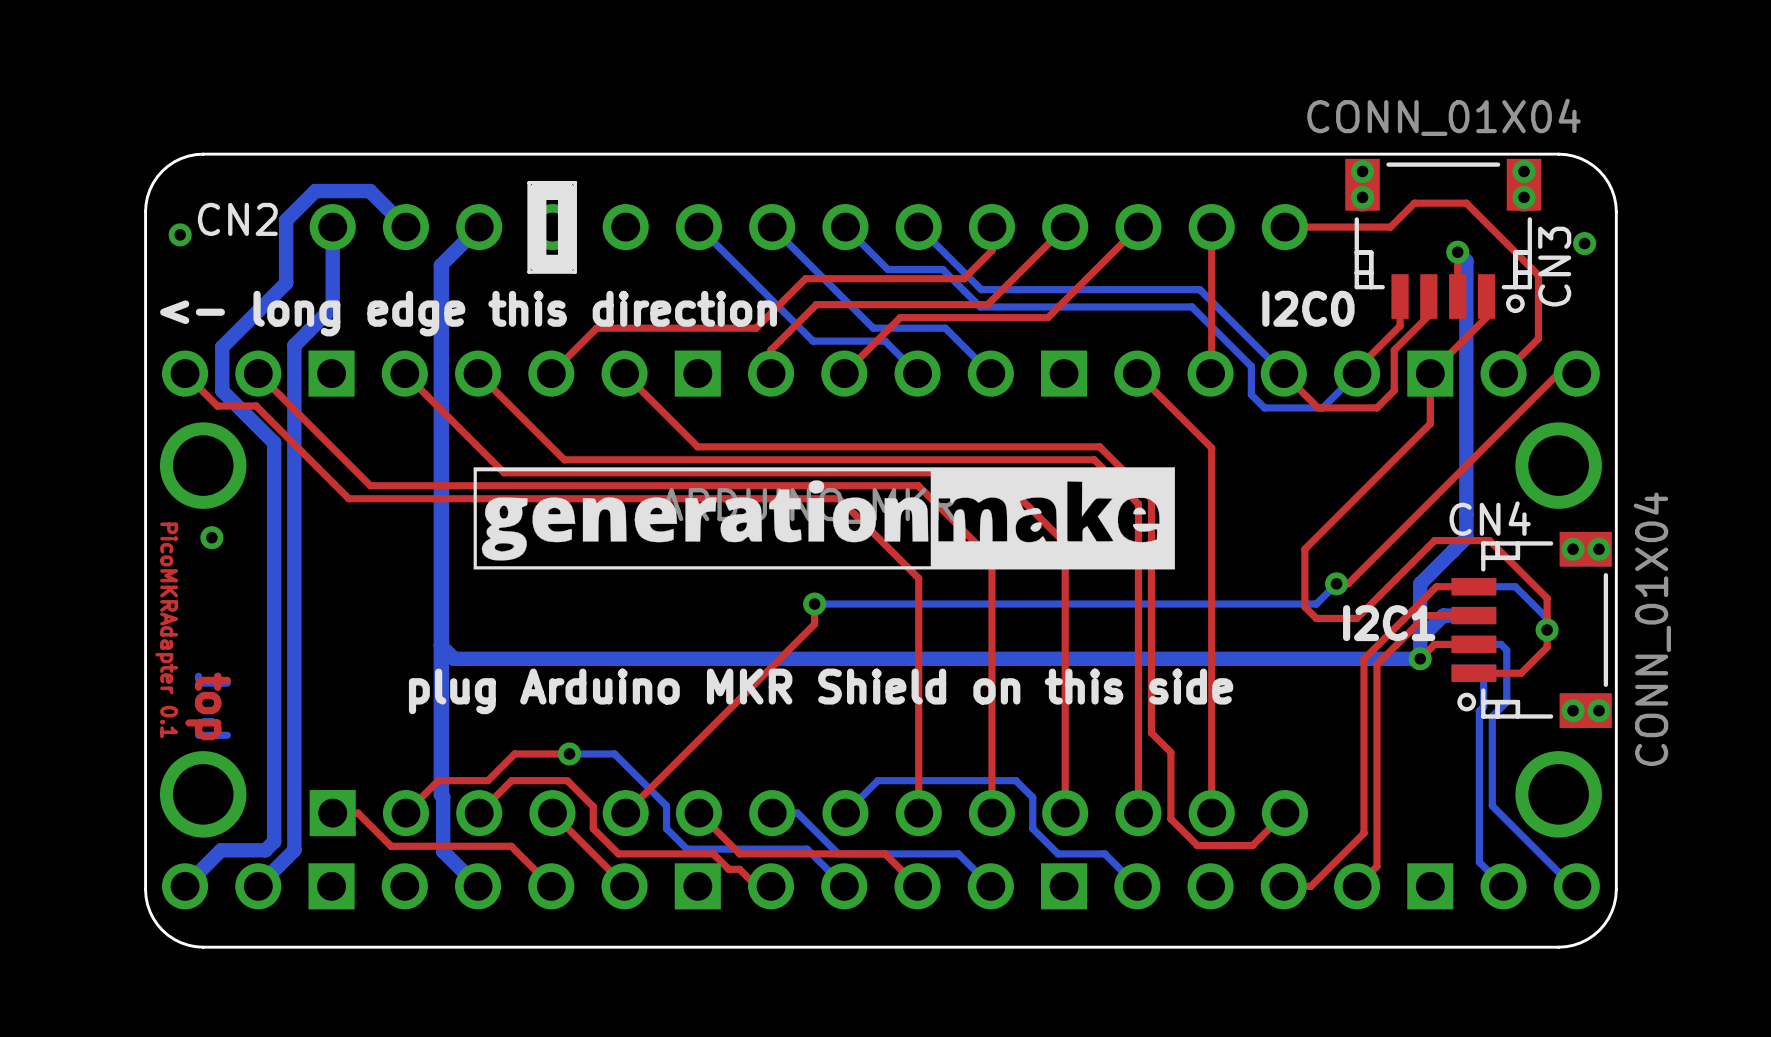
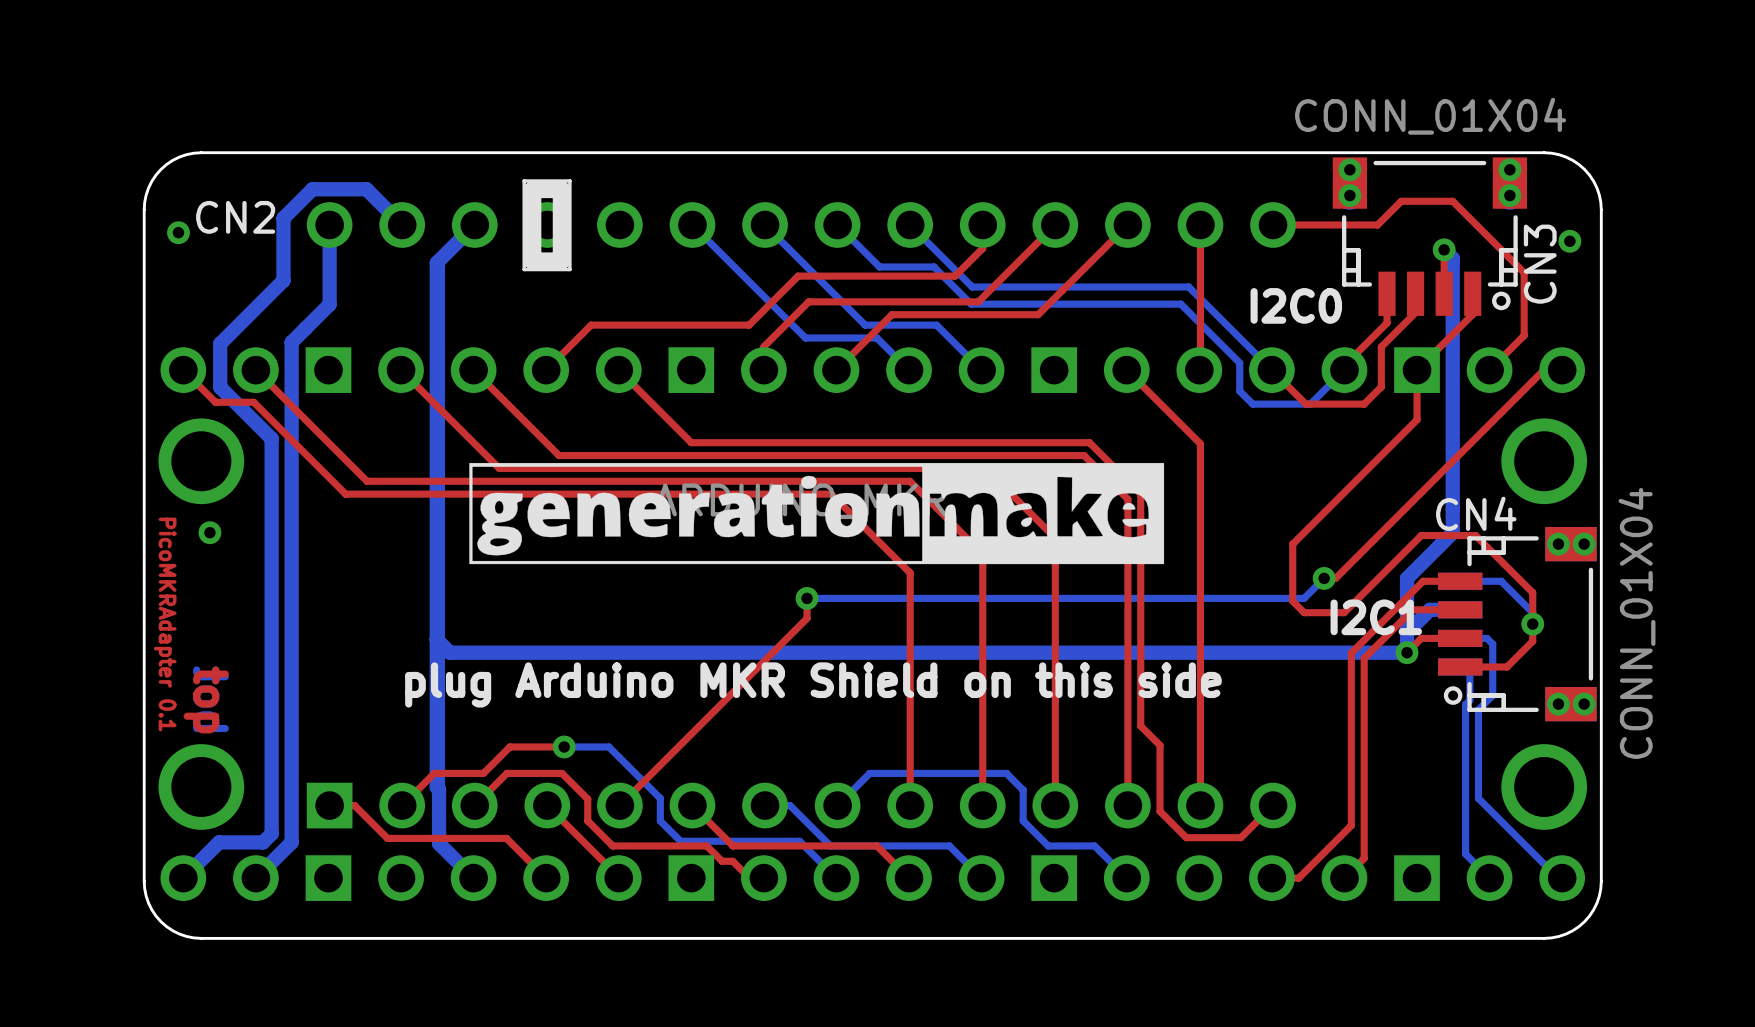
text: <- long edge this direction (468, 313) -> none

